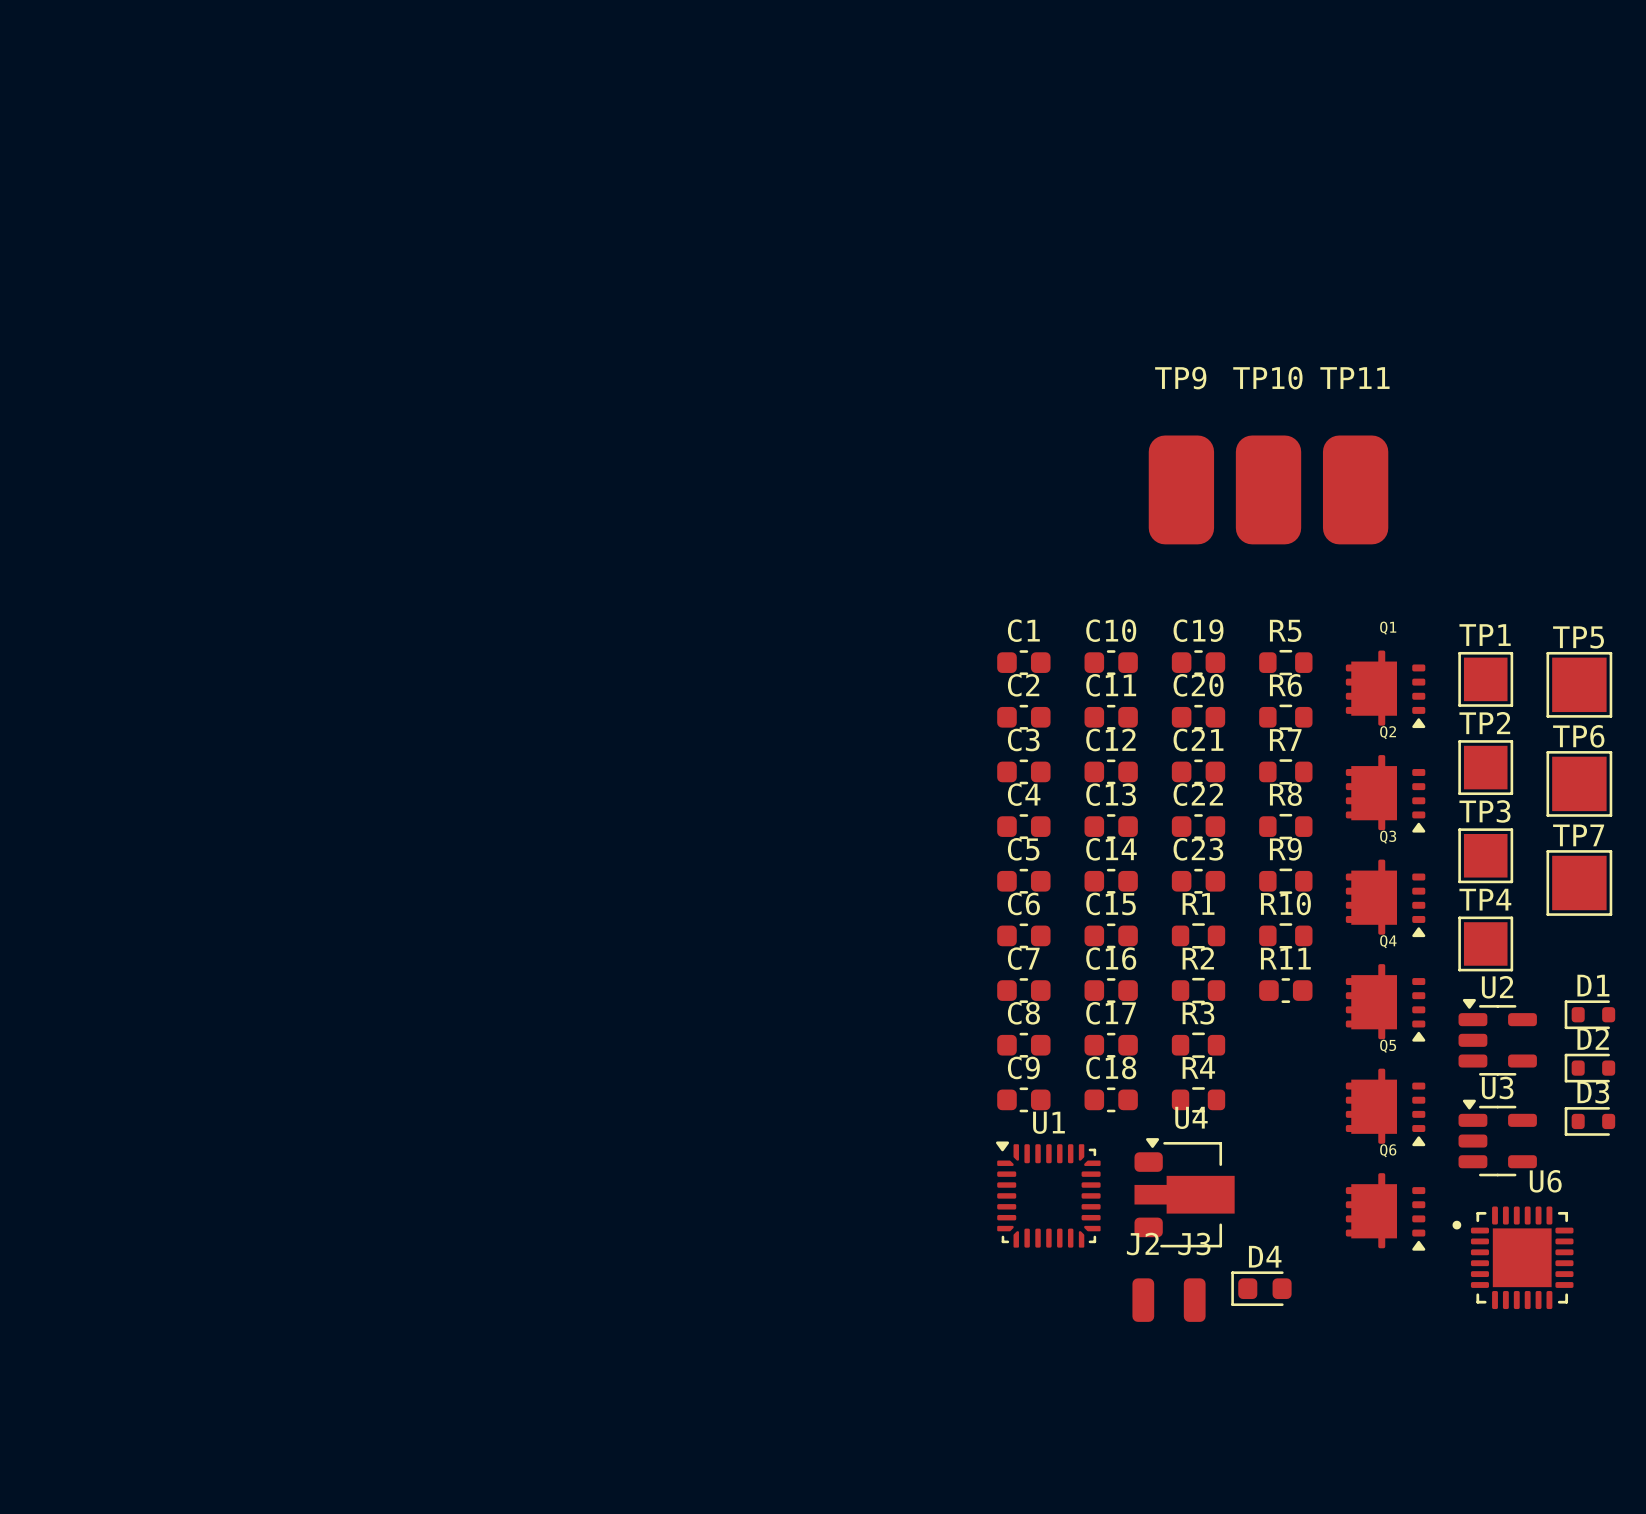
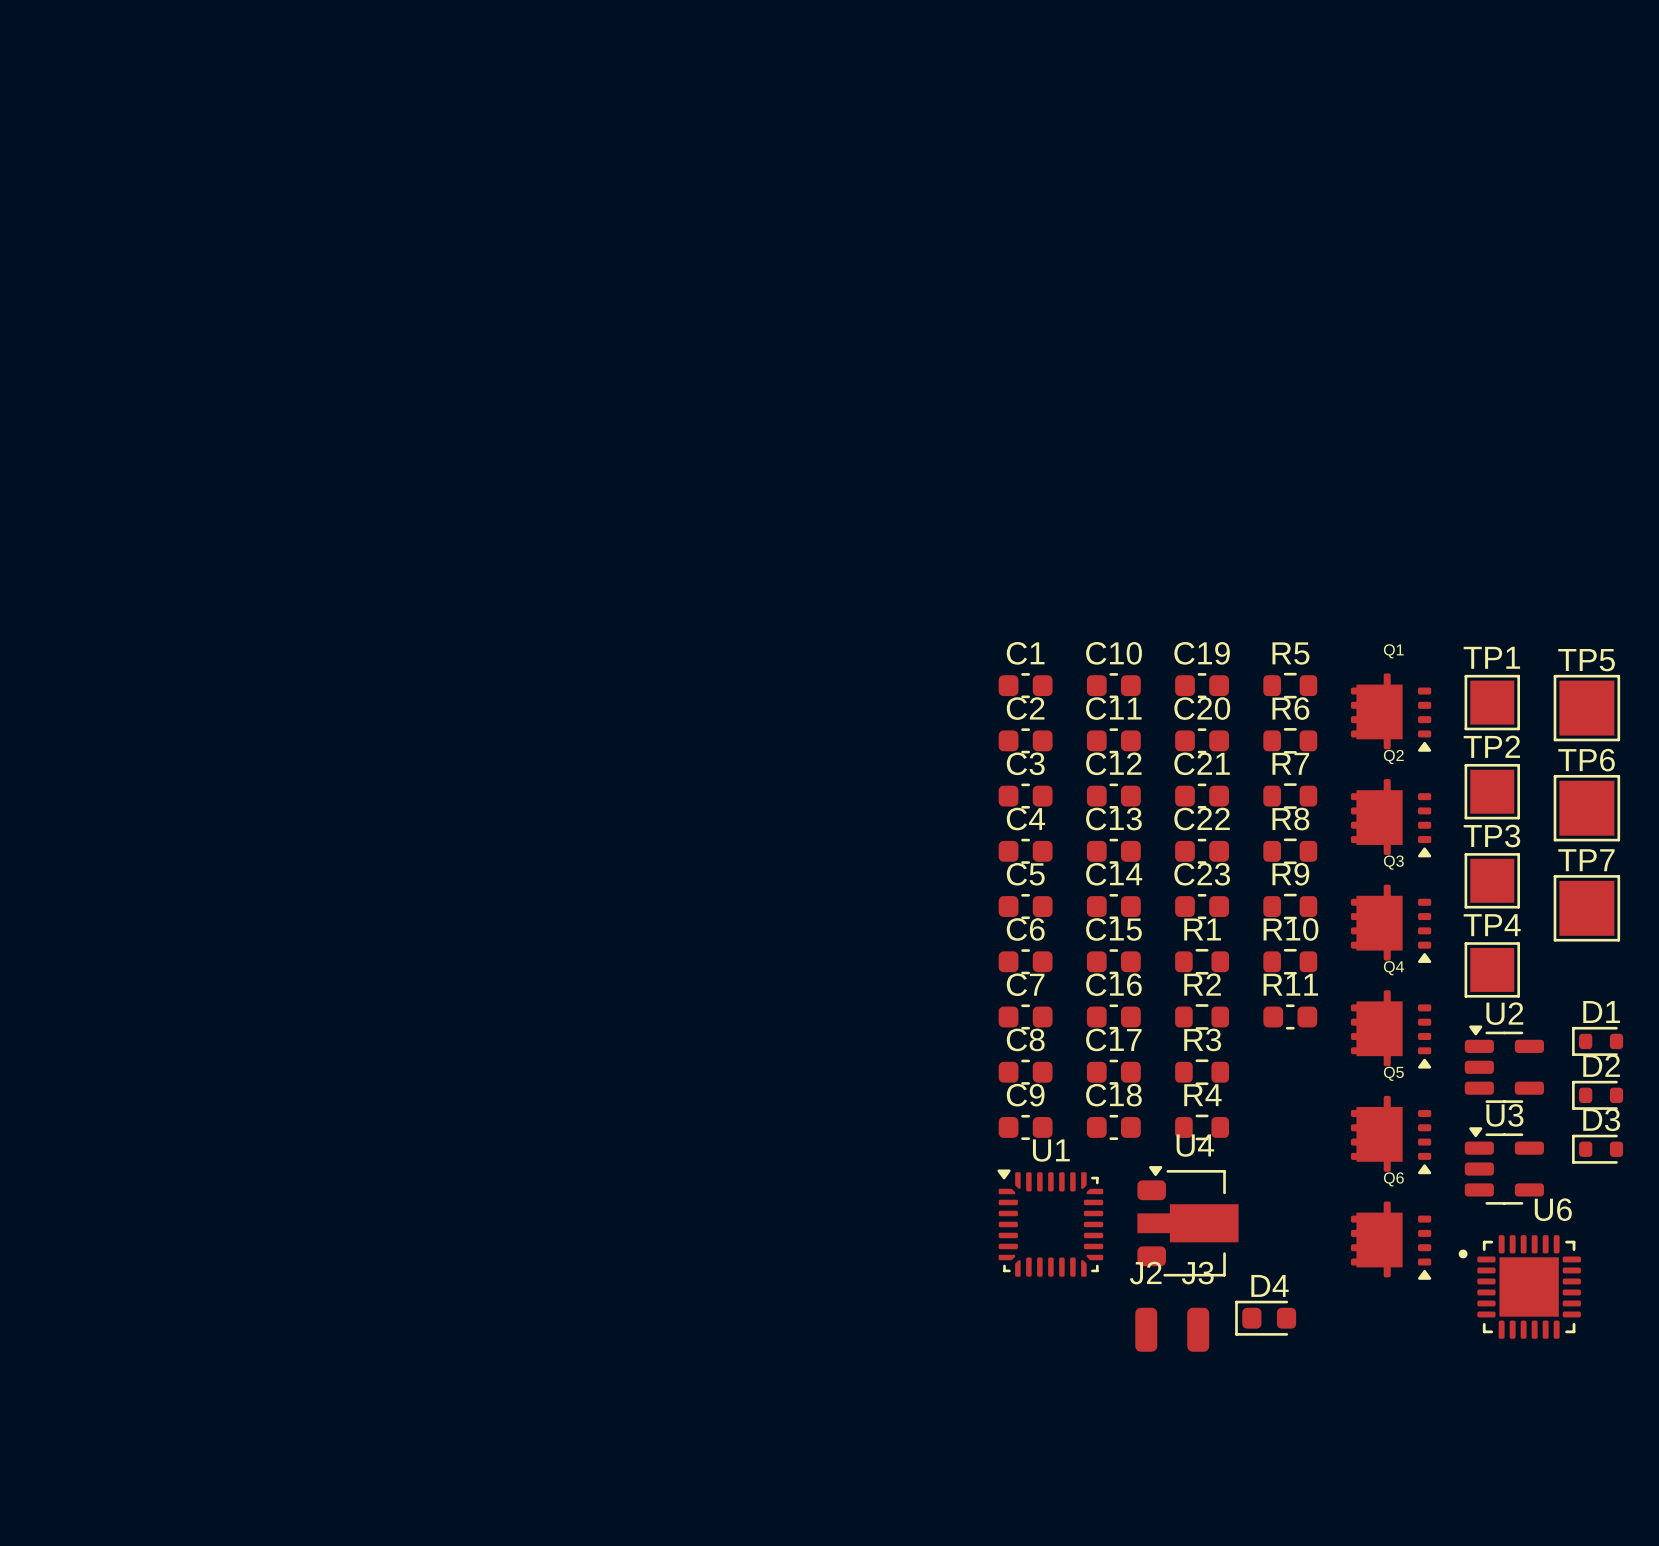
TP9: (1181, 489) -> none
TP10: (1268, 489) -> none
TP11: (1355, 489) -> none

